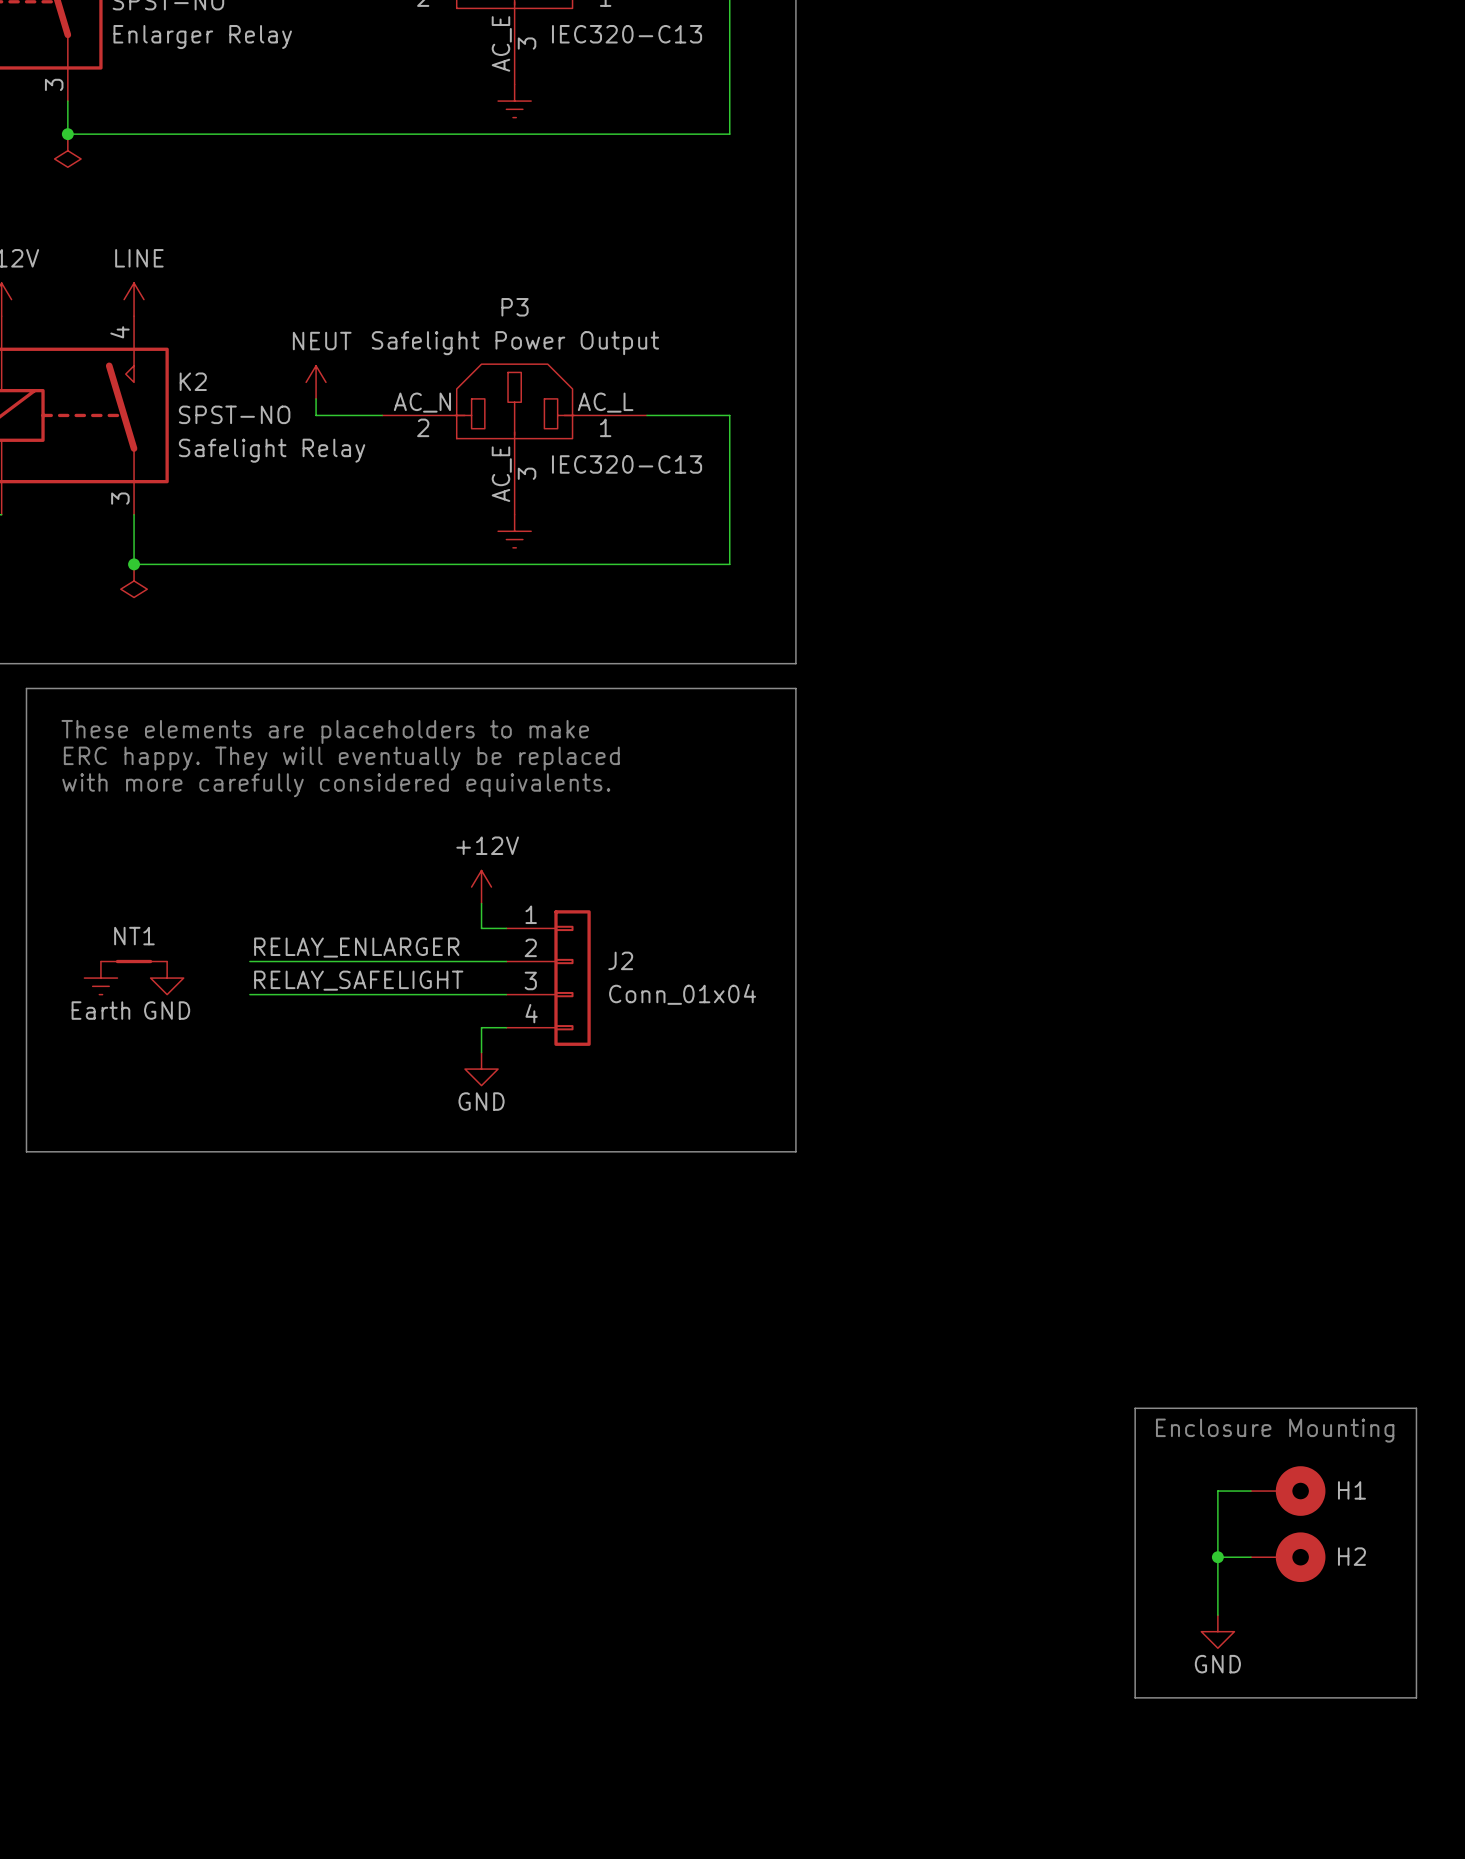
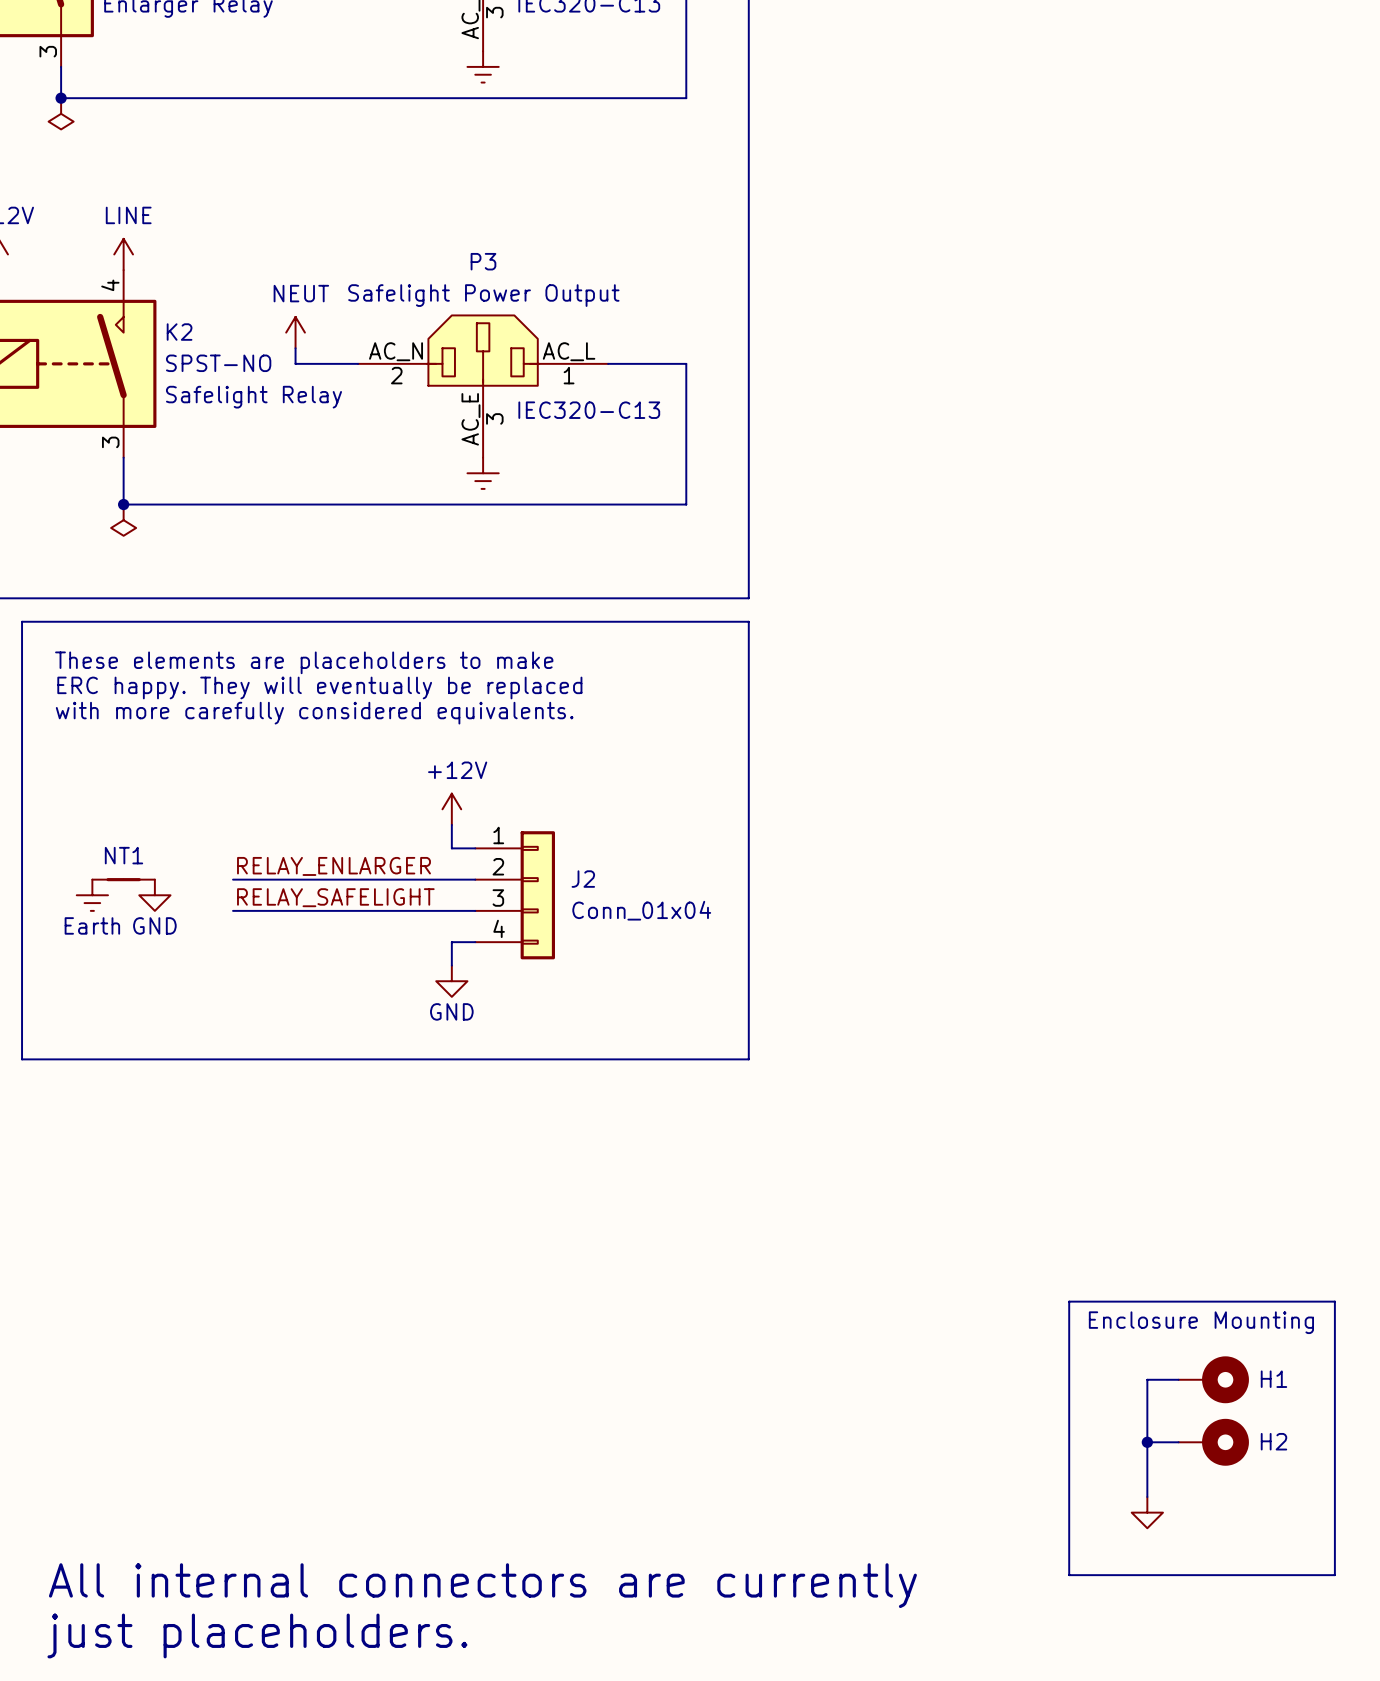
power symbol text: GND (1217, 1664) -> none
text: none -> All internal connectors are currently (482, 1585)
text: none -> just placeholders. (257, 1635)

